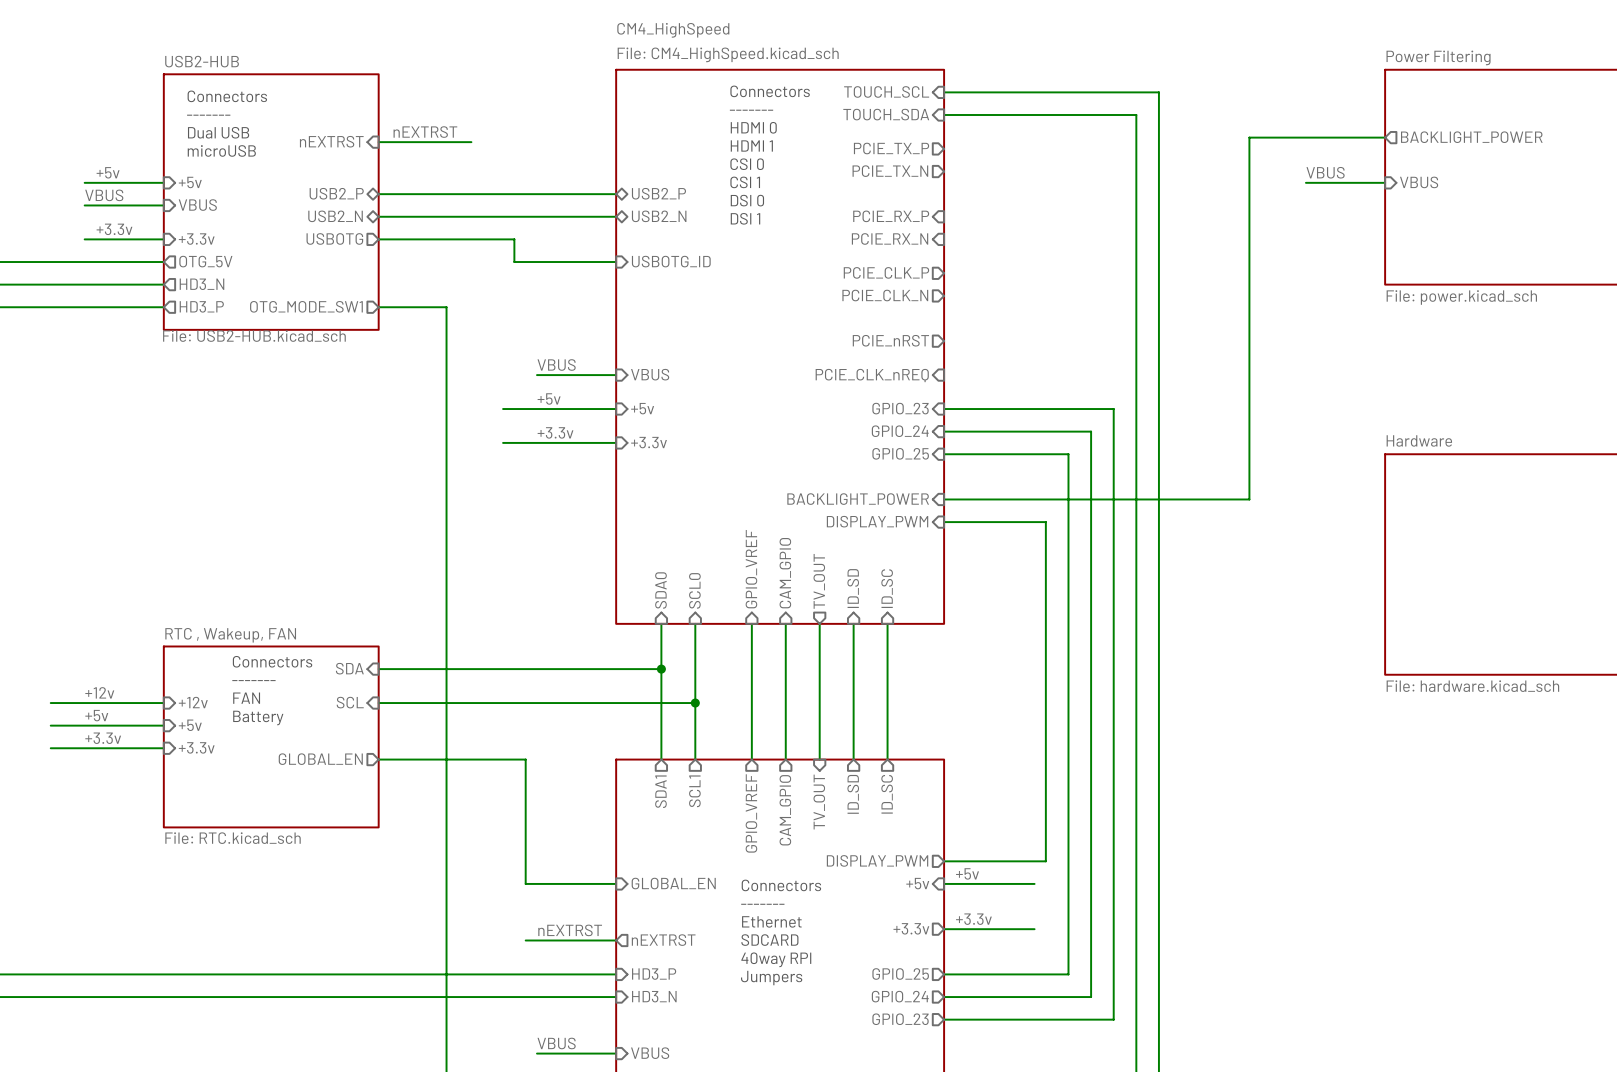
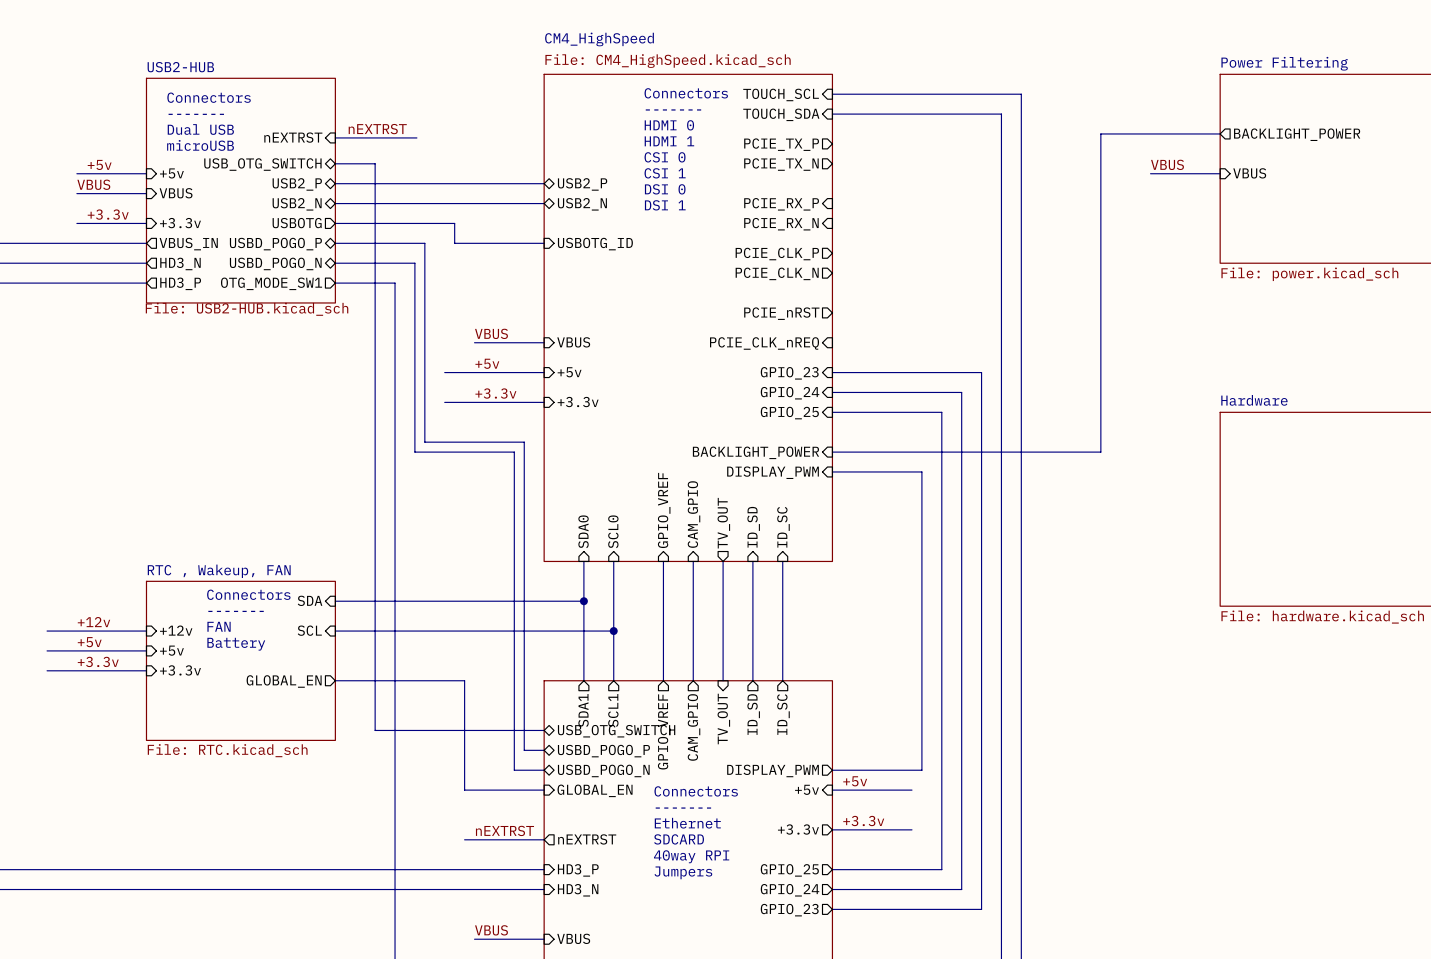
sheet pin: none -> USB_OTG_SWITCH (262, 164)
wire: none -> (335, 163) (375, 163) (375, 730) (544, 730)
sheet pin: OTG_5V (205, 261) -> VBUS_IN (188, 244)
sheet pin: none -> USBD_POGO_P (275, 244)
wire: none -> (335, 243) (424, 243) (424, 442) (524, 442) (524, 750) (544, 750)
sheet pin: none -> USBD_POGO_N (275, 263)
wire: none -> (335, 263) (414, 263) (414, 452) (514, 452) (514, 770) (544, 770)
sheet pin: none -> USB_OTG_SWITCH (616, 731)
sheet pin: none -> USBD_POGO_P (603, 751)
sheet pin: none -> USBD_POGO_N (603, 770)

